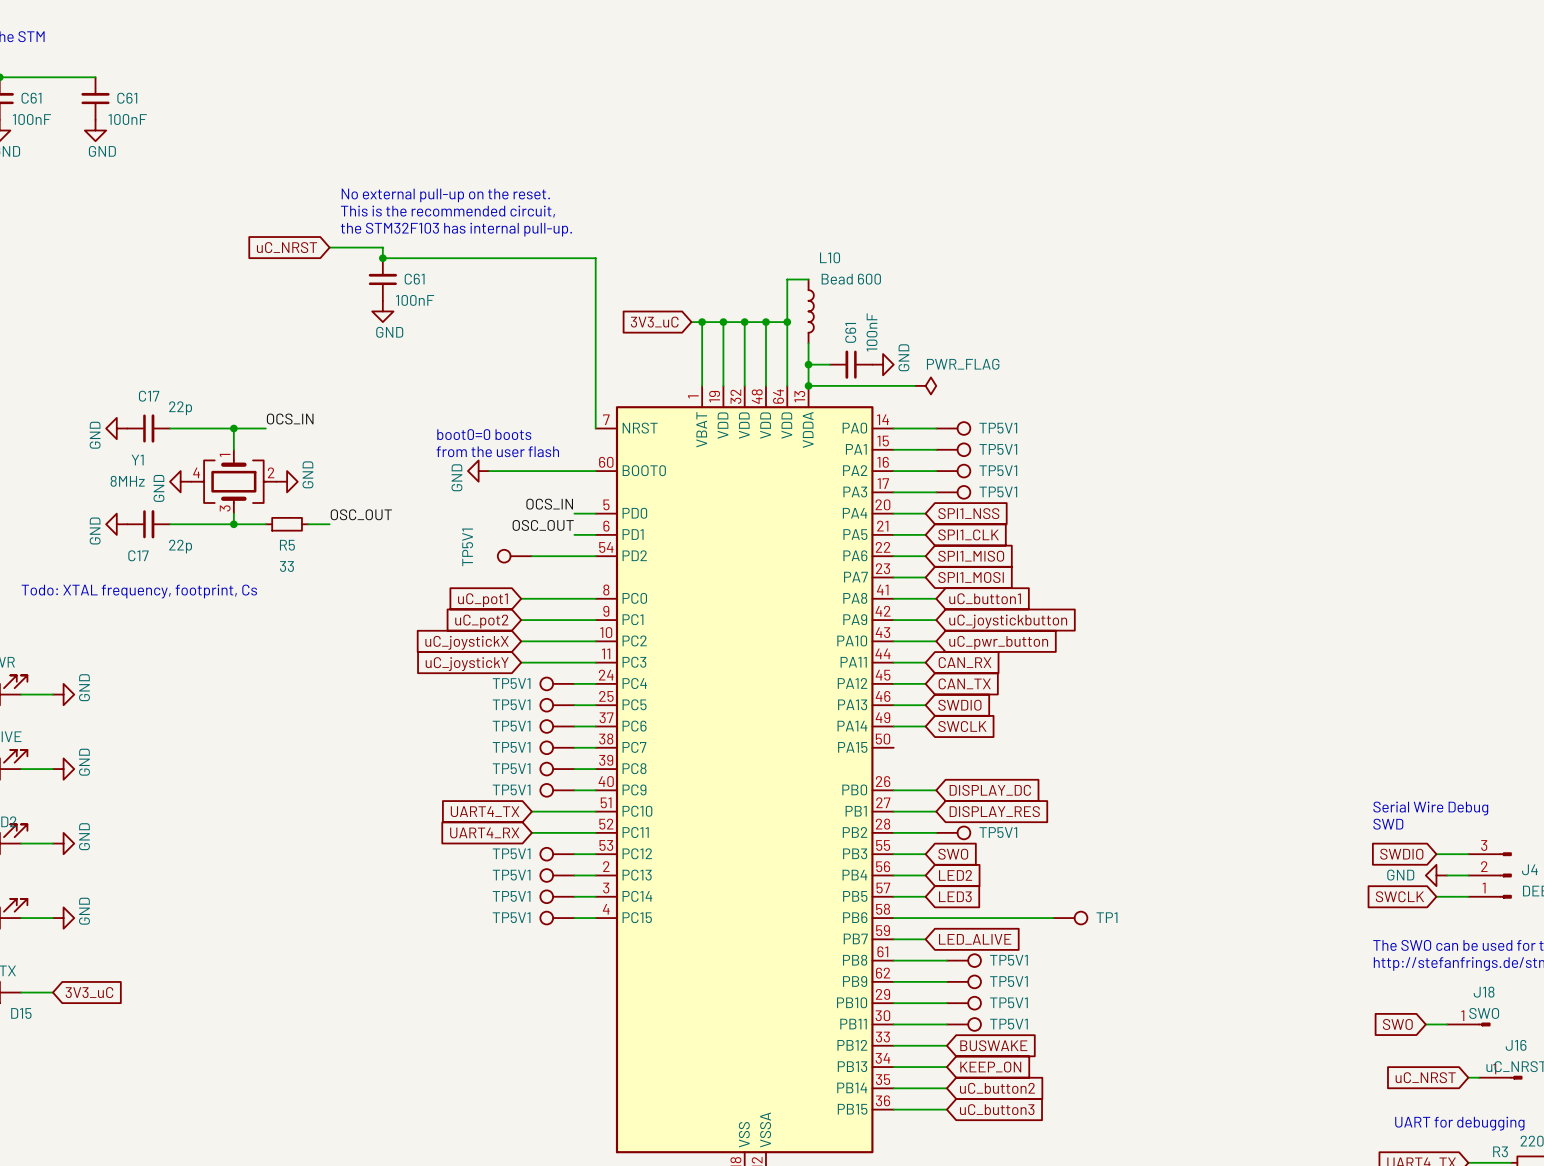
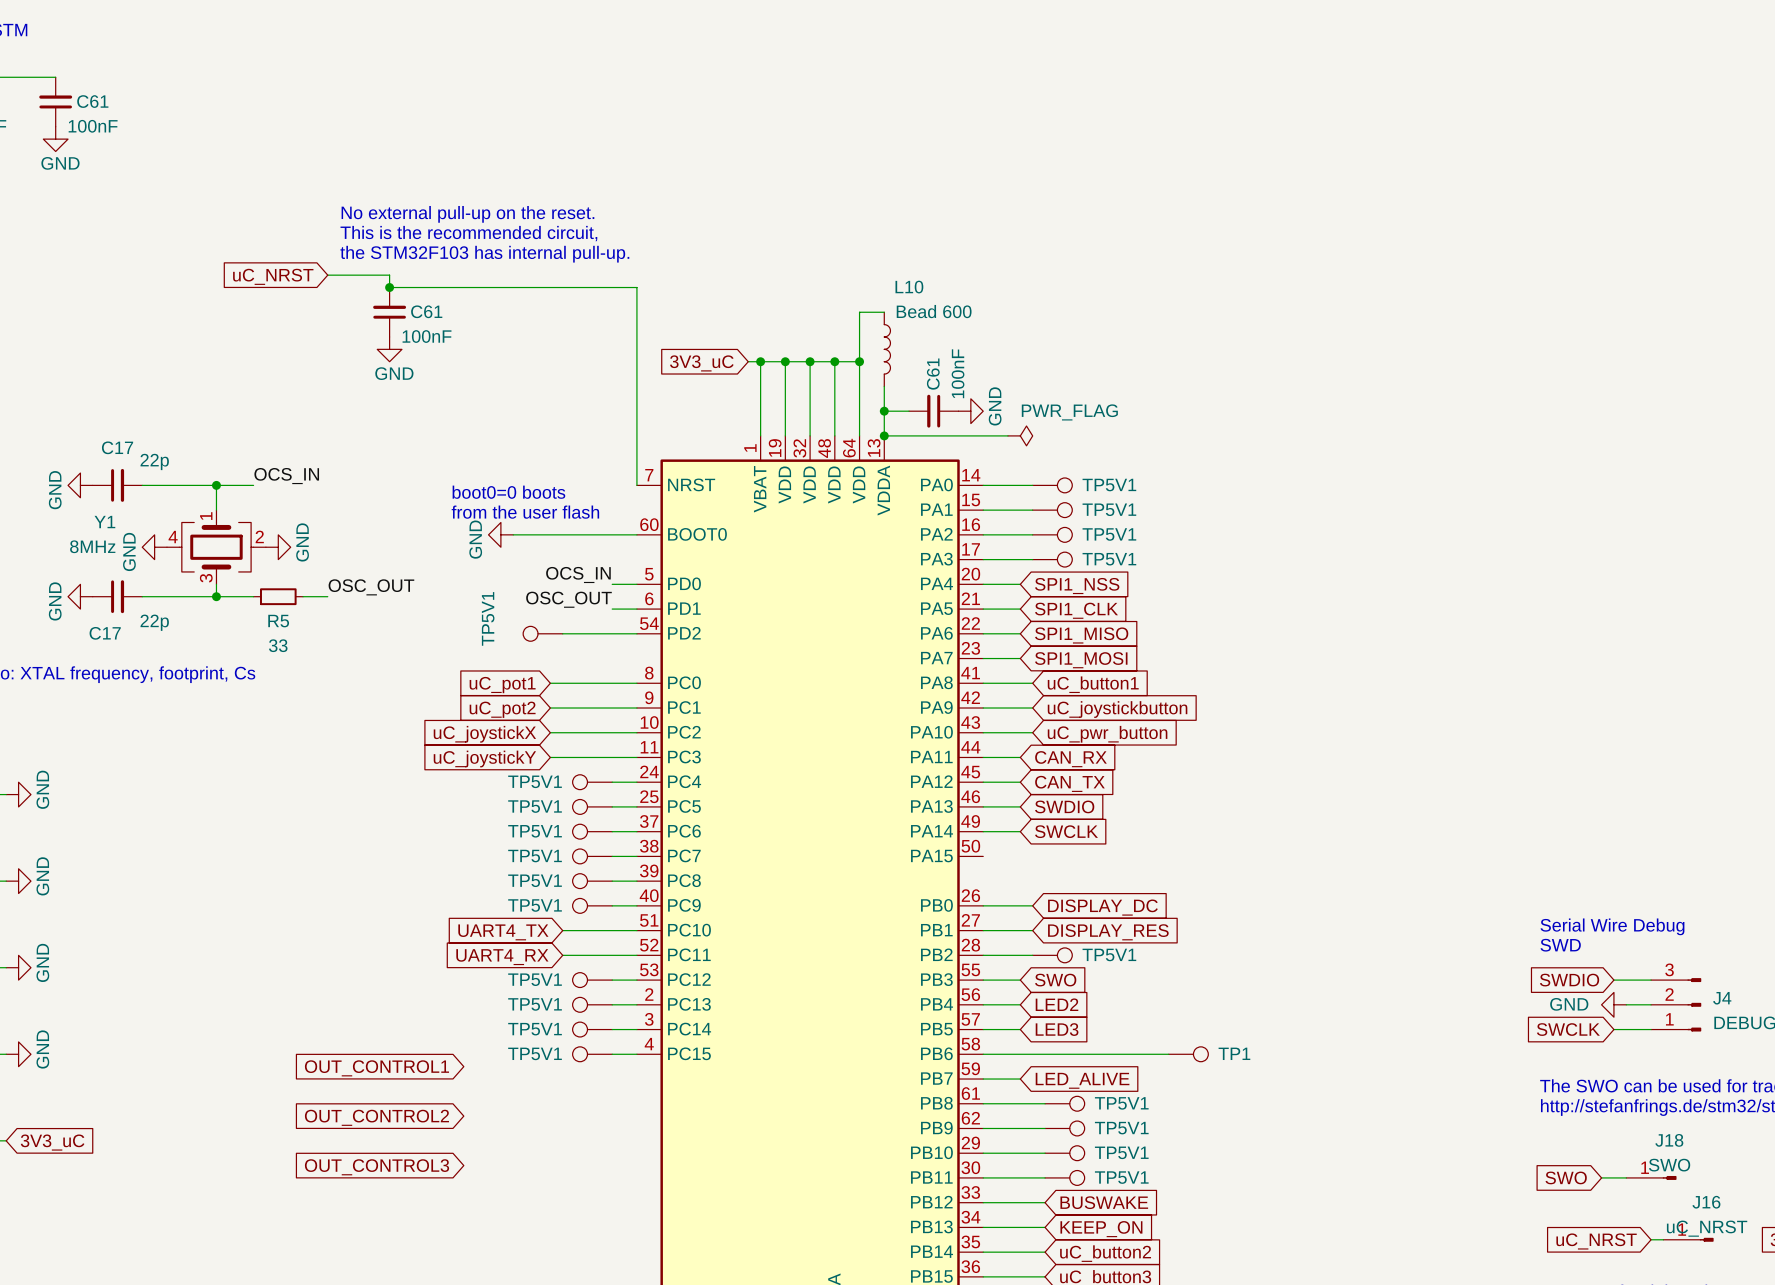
global label: none -> OUT_CONTROL1 (376, 1068)
global label: none -> OUT_CONTROL2 (376, 1117)
global label: none -> OUT_CONTROL3 (377, 1167)

